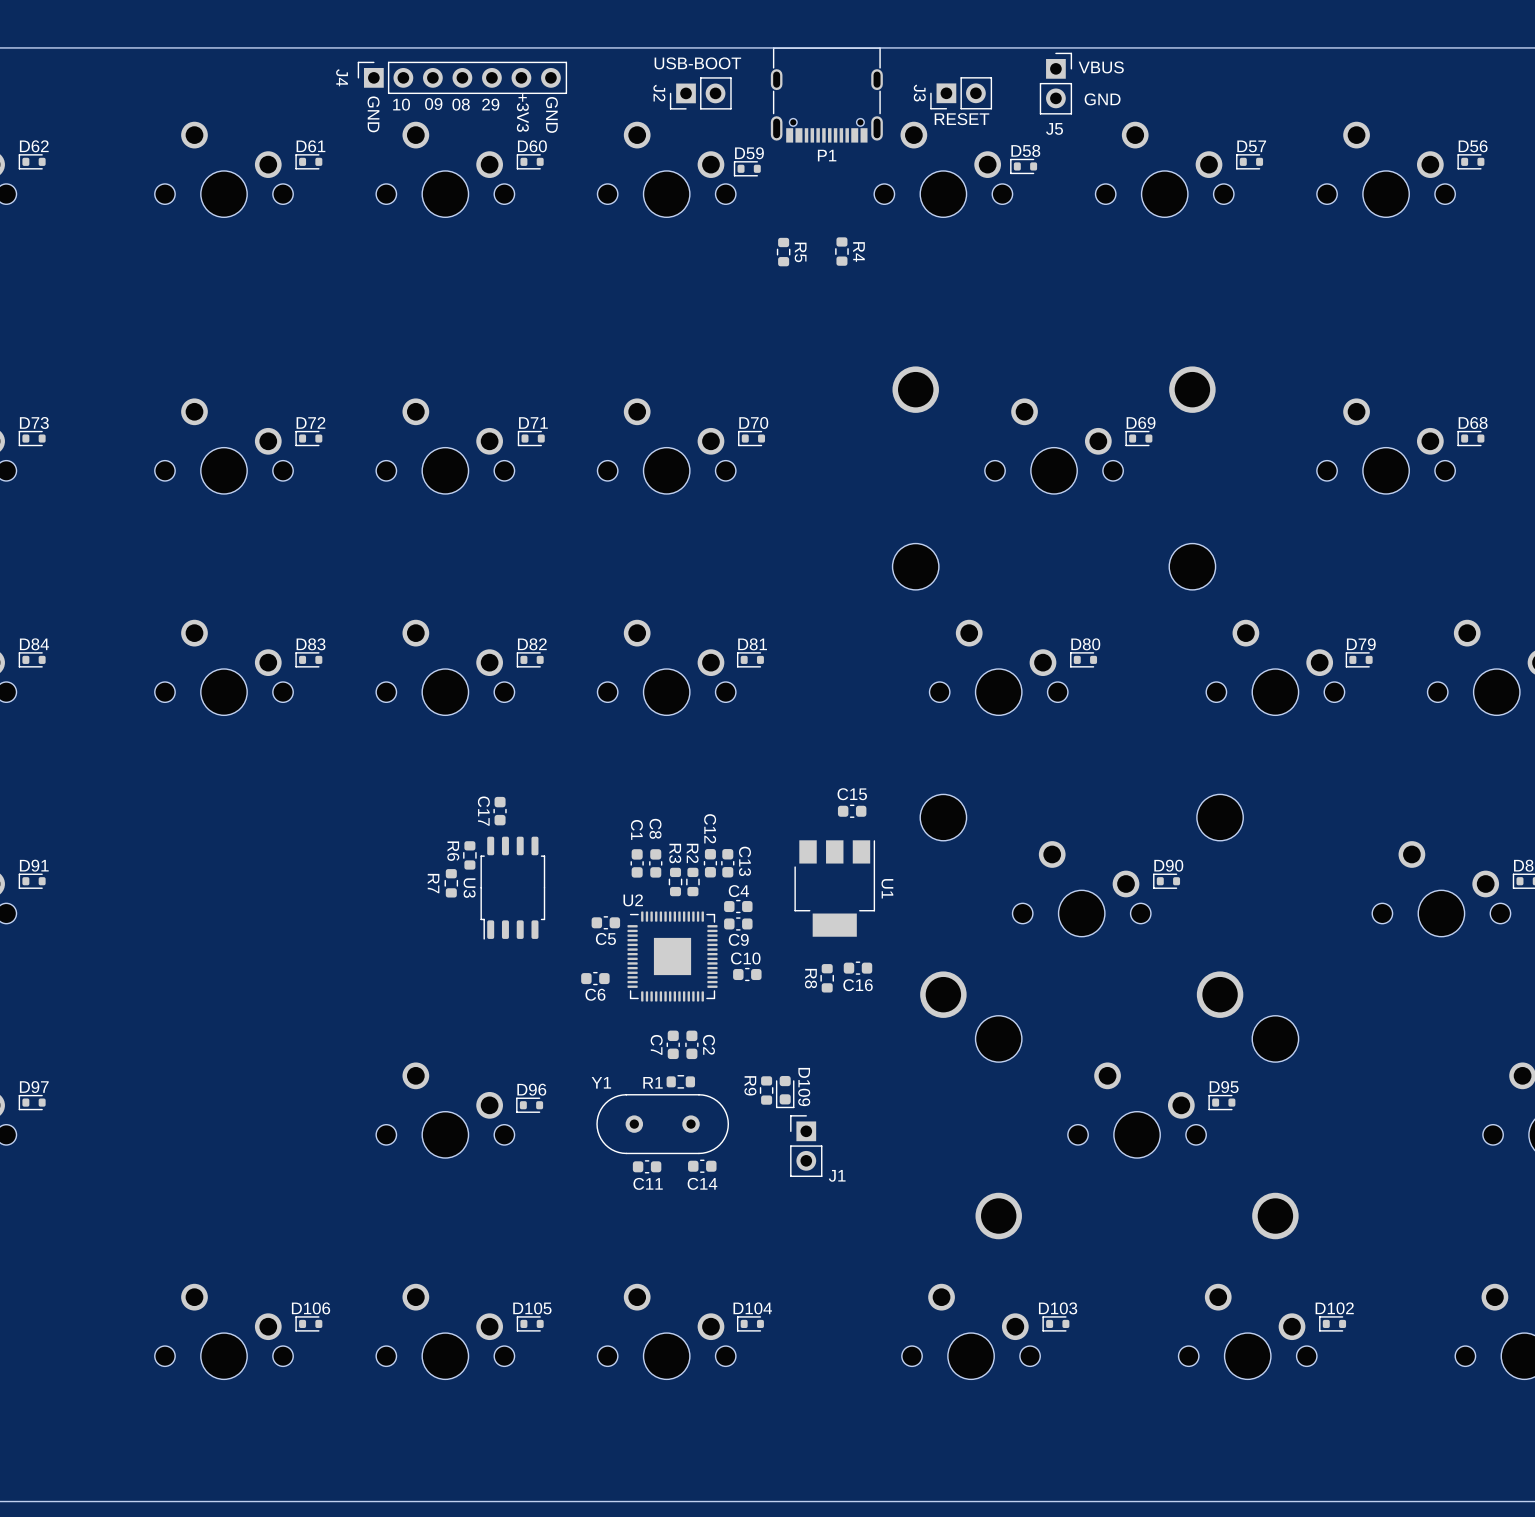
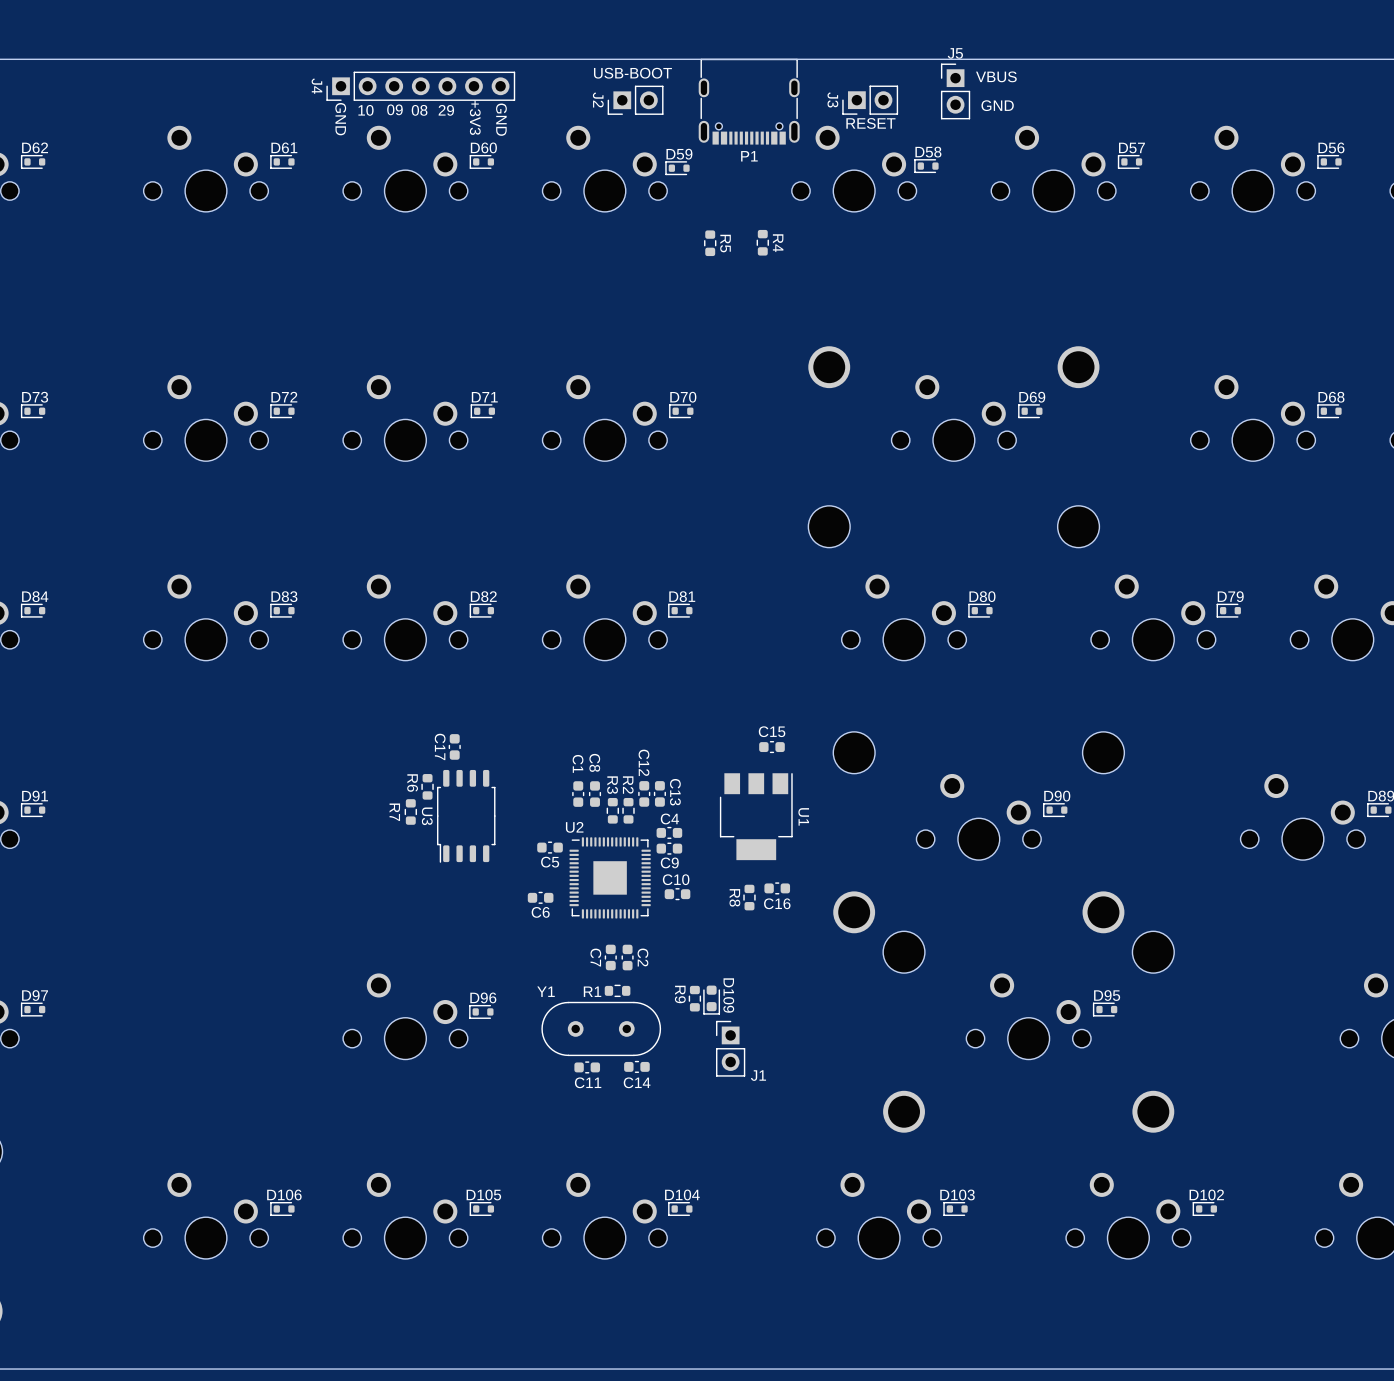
J5 footprint: [1039, 52, 1073, 115] -> [941, 63, 971, 120]
J4 footprint: [357, 61, 568, 95] -> [326, 71, 516, 101]
J5 name position: J5 (1054, 128) -> J5 (955, 53)

